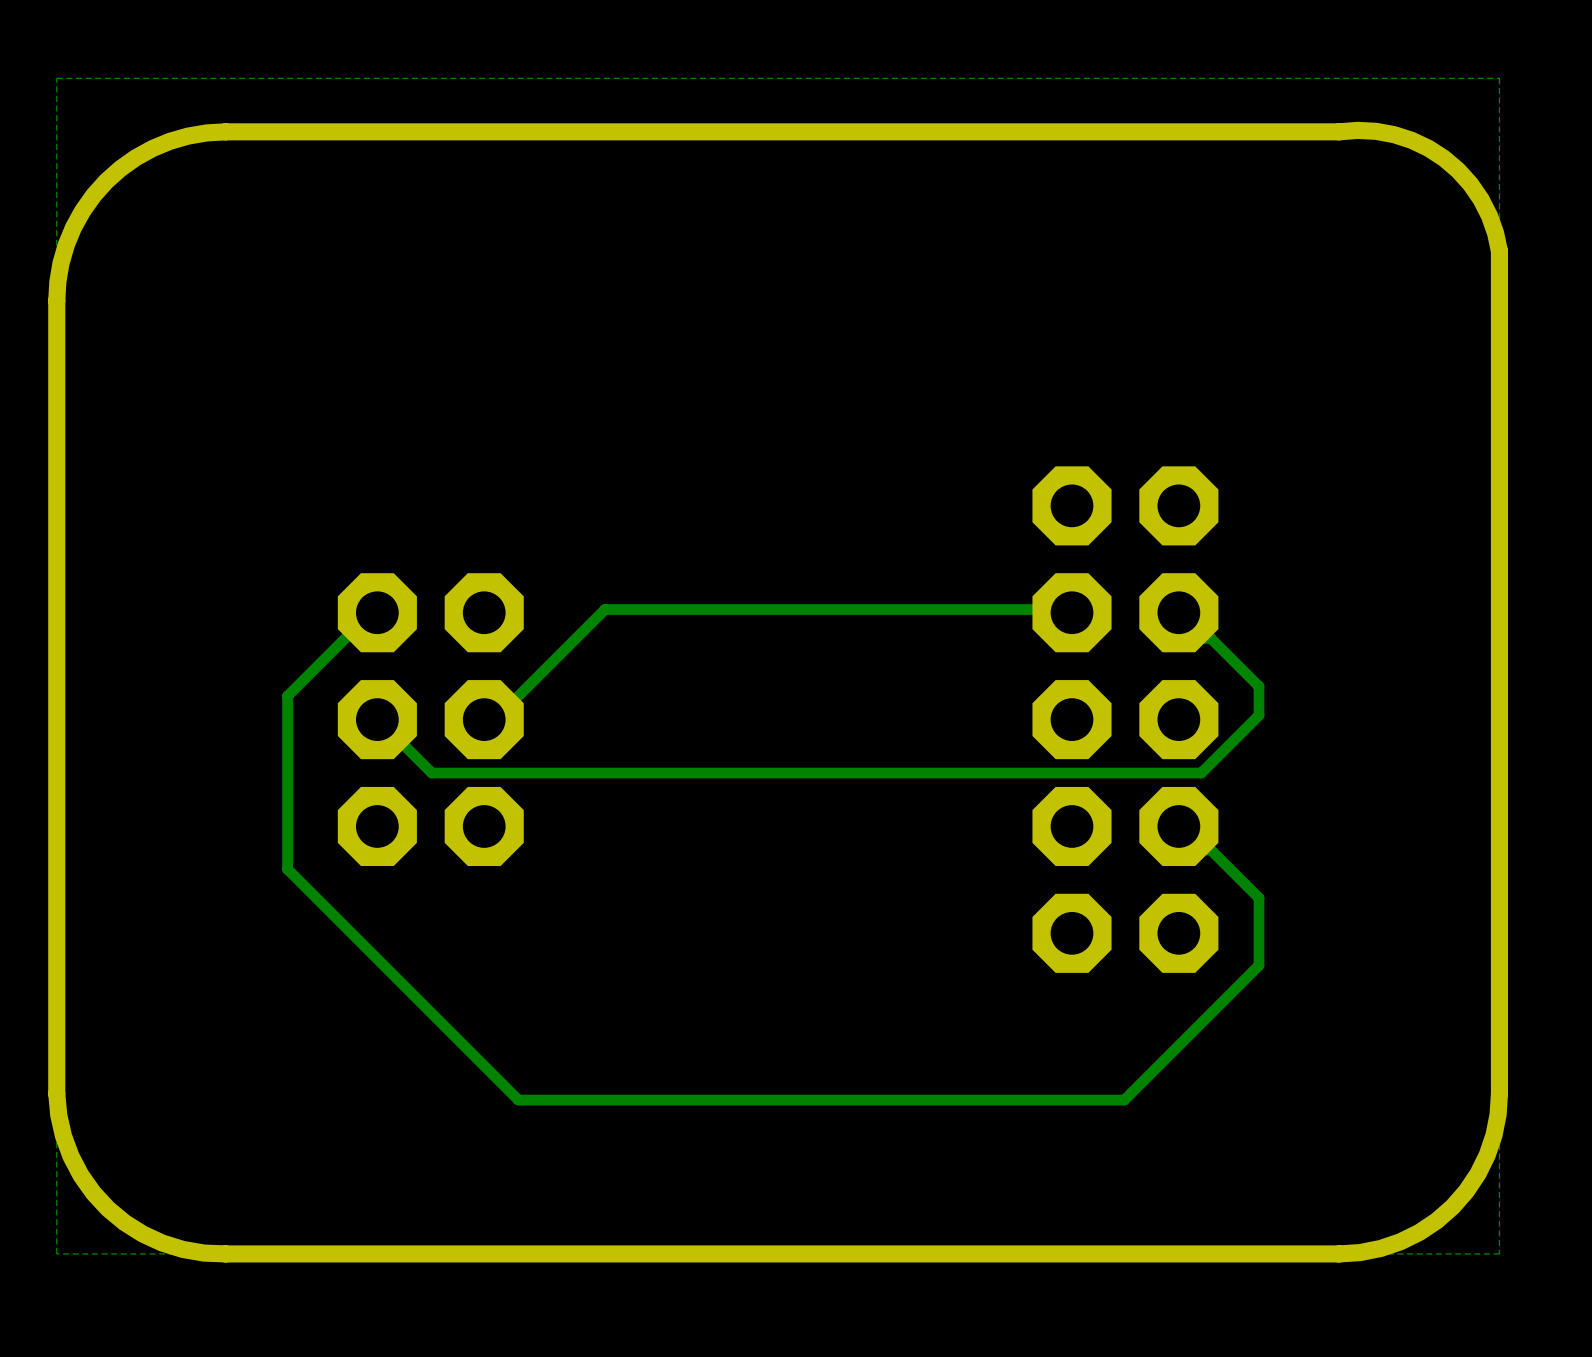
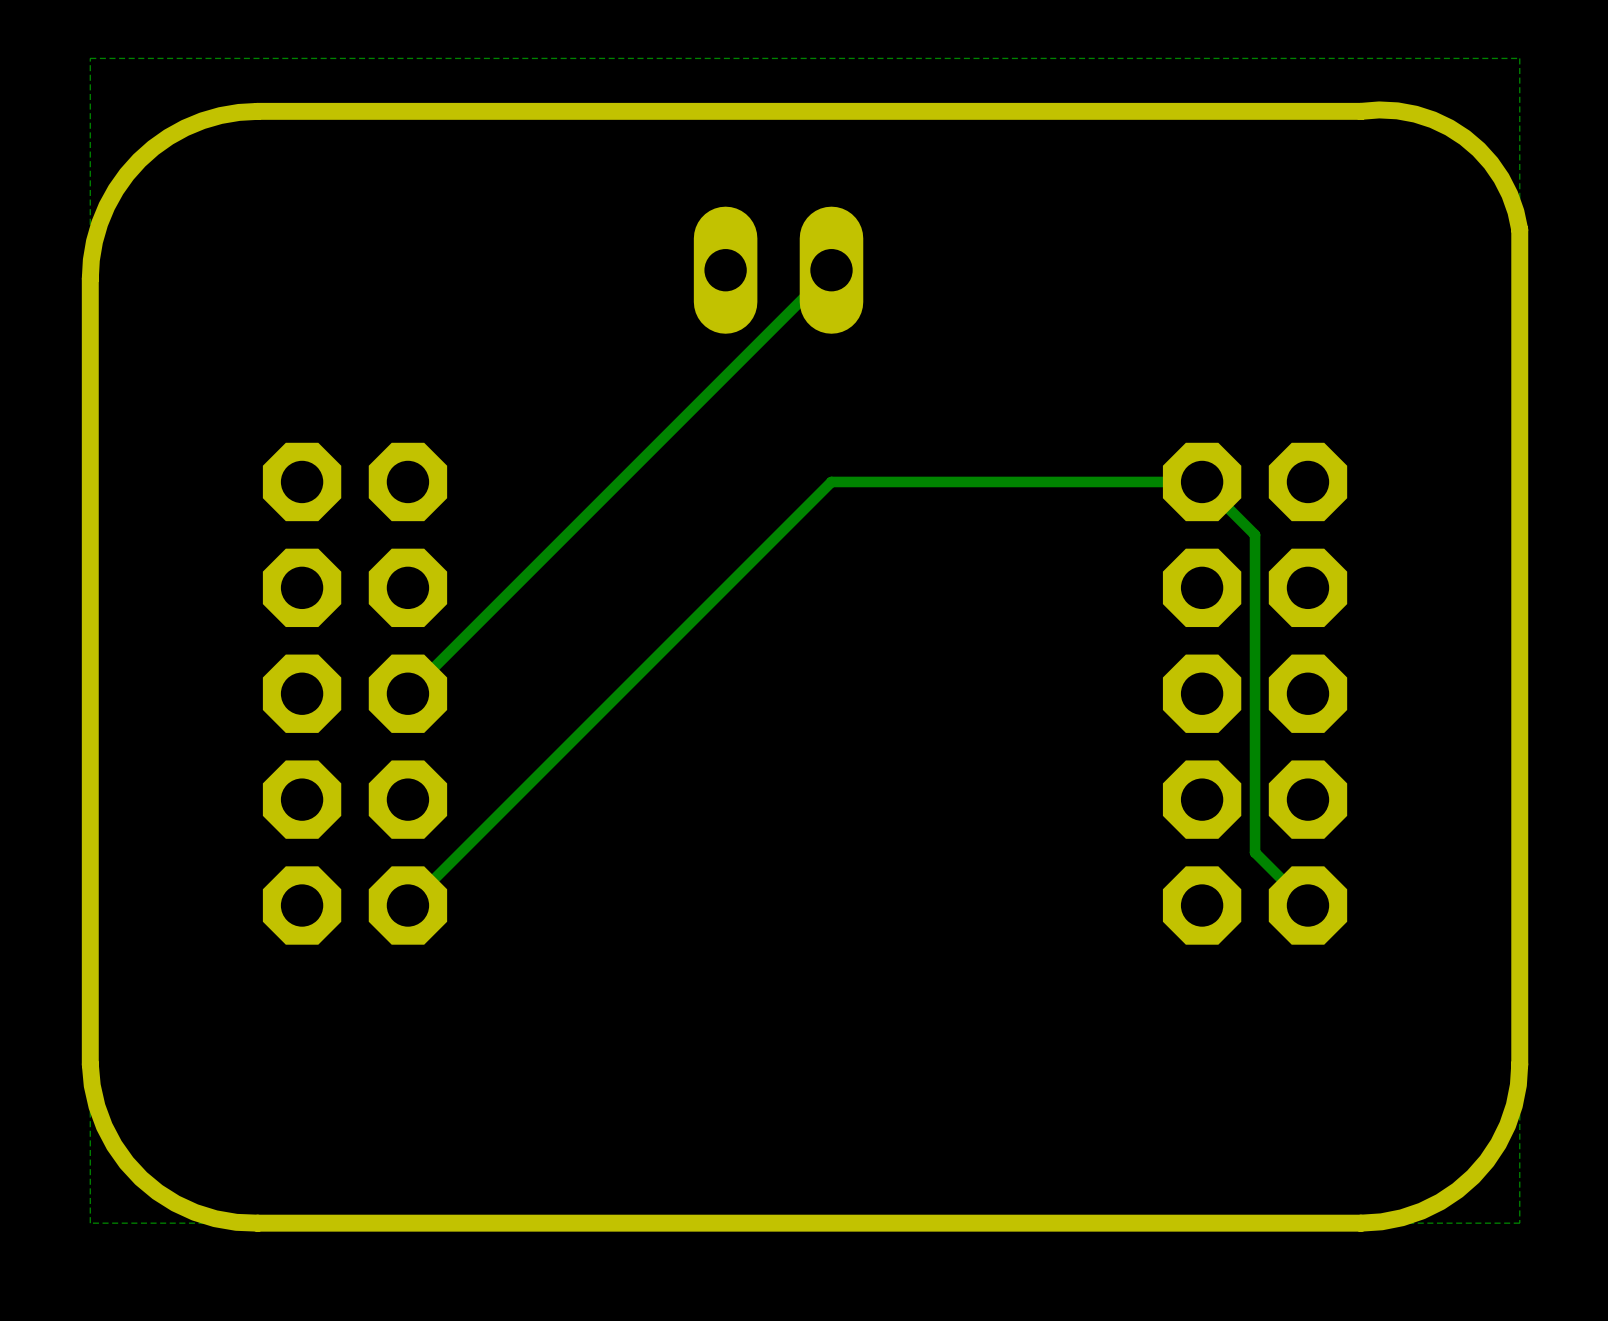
part: none -> (778, 270)
track: (377, 612) (374, 609) (287, 696) (287, 869) (518, 1100) (1124, 1100) (1259, 965) (1259, 898) (1210, 849) (1201, 849) (1178, 826) -> none
track: (1071, 612) (1066, 609) (604, 609) (489, 724) (484, 719) -> none
track: (1178, 612) (1182, 619) (1201, 638) (1210, 638) (1259, 686) (1259, 715) (1201, 773) (431, 773) (377, 719) -> (831, 270) (407, 693)
part: none -> (355, 693)
part: (430, 719) -> none
part position: (1125, 719) -> (1255, 693)
track: none -> (1307, 905) (1255, 852) (1255, 534) (1202, 481) (831, 481) (407, 905)

